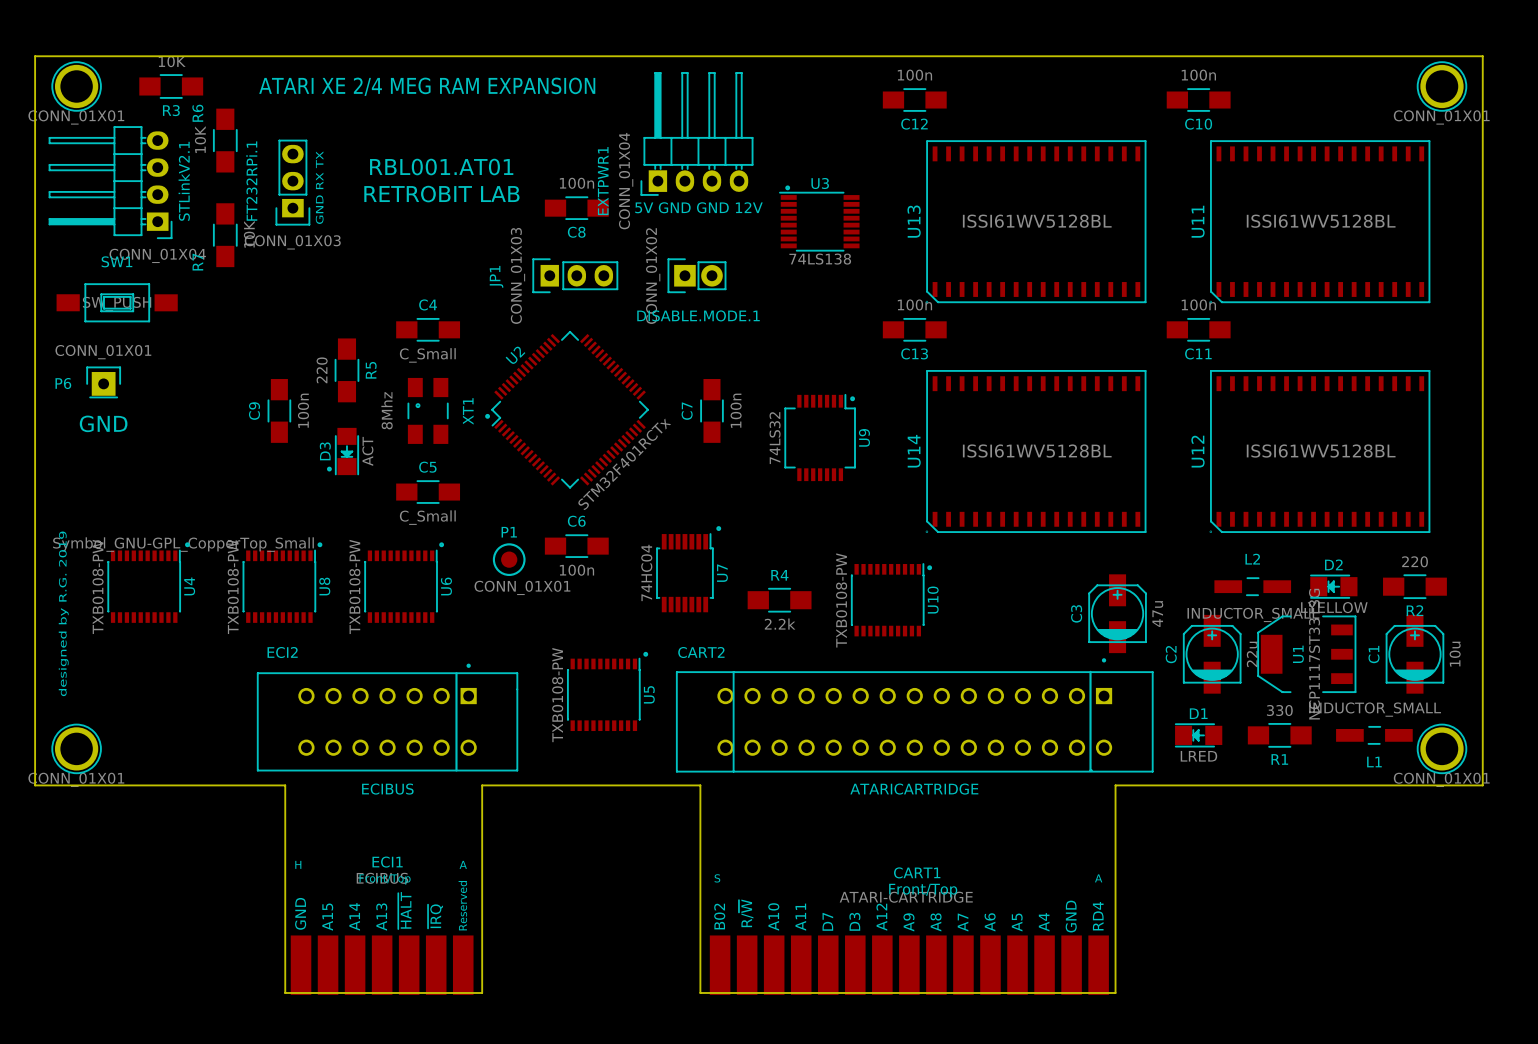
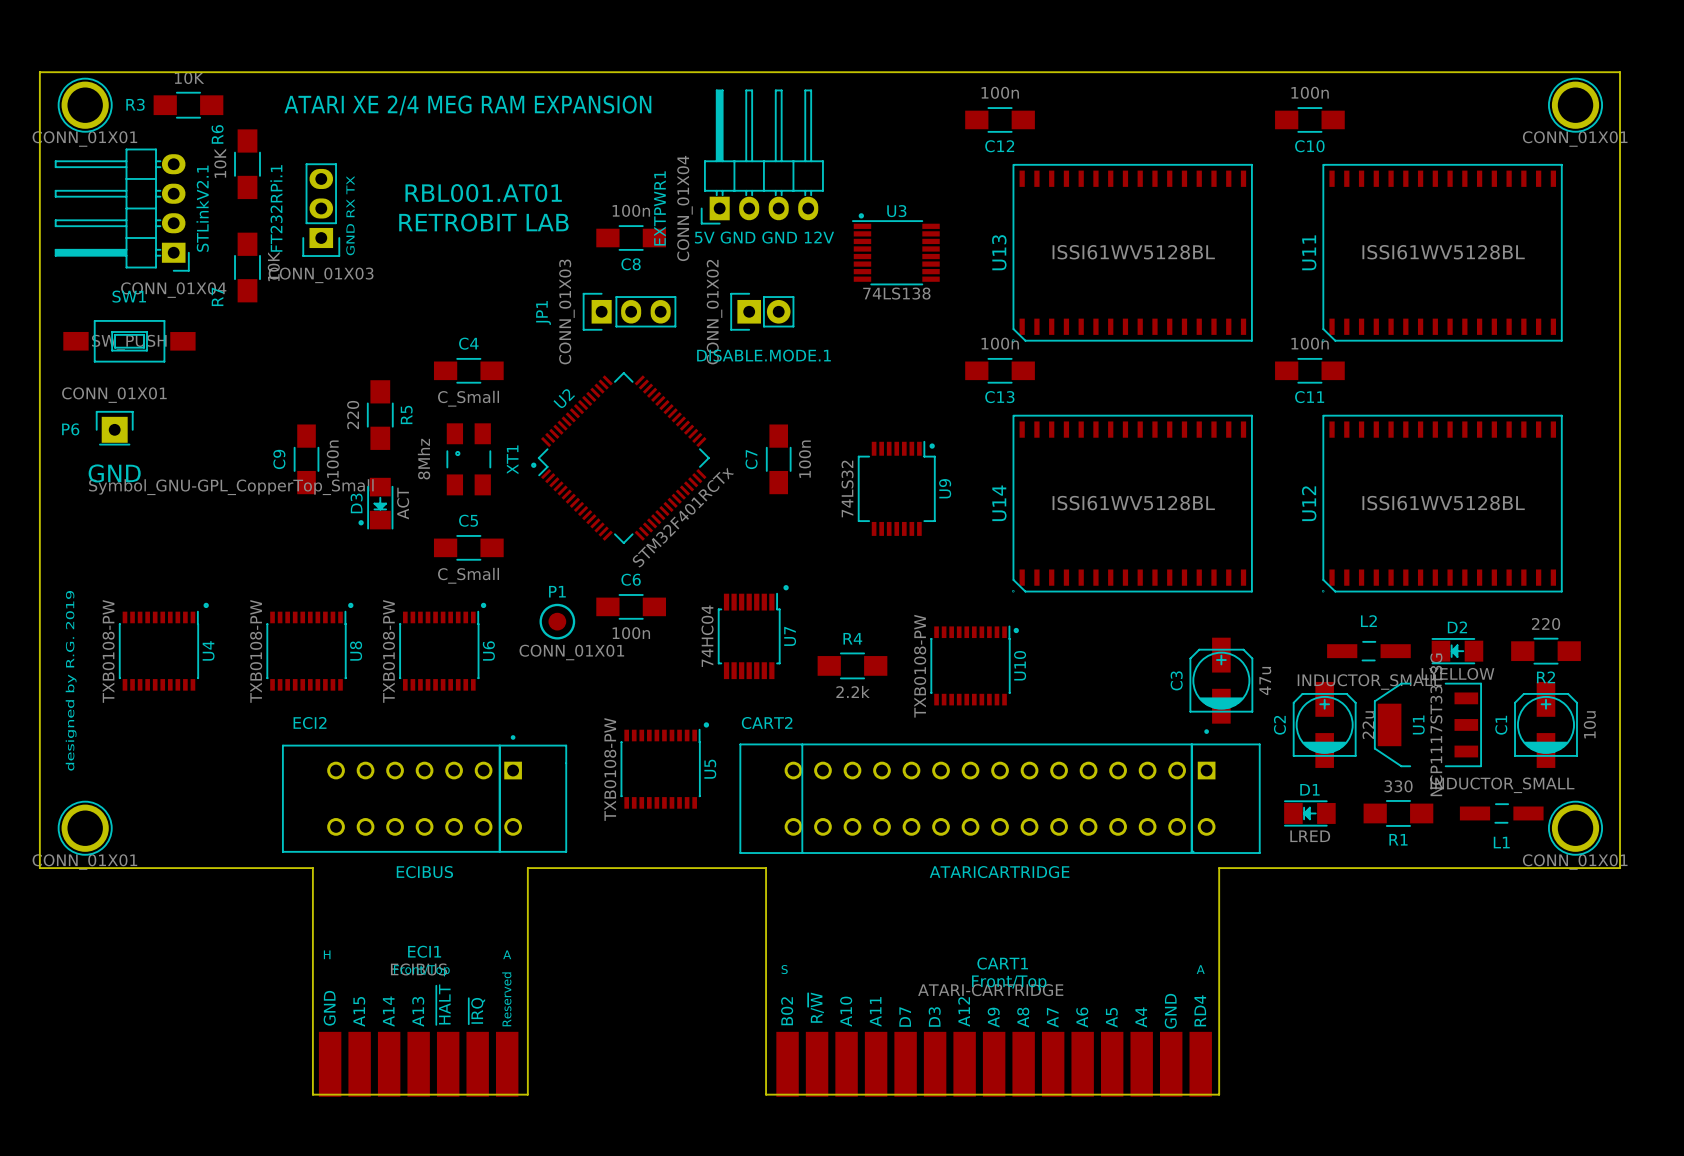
R3 name position: R3 (171, 110) -> R3 (135, 104)
drawing position: (183, 544) -> (231, 487)

